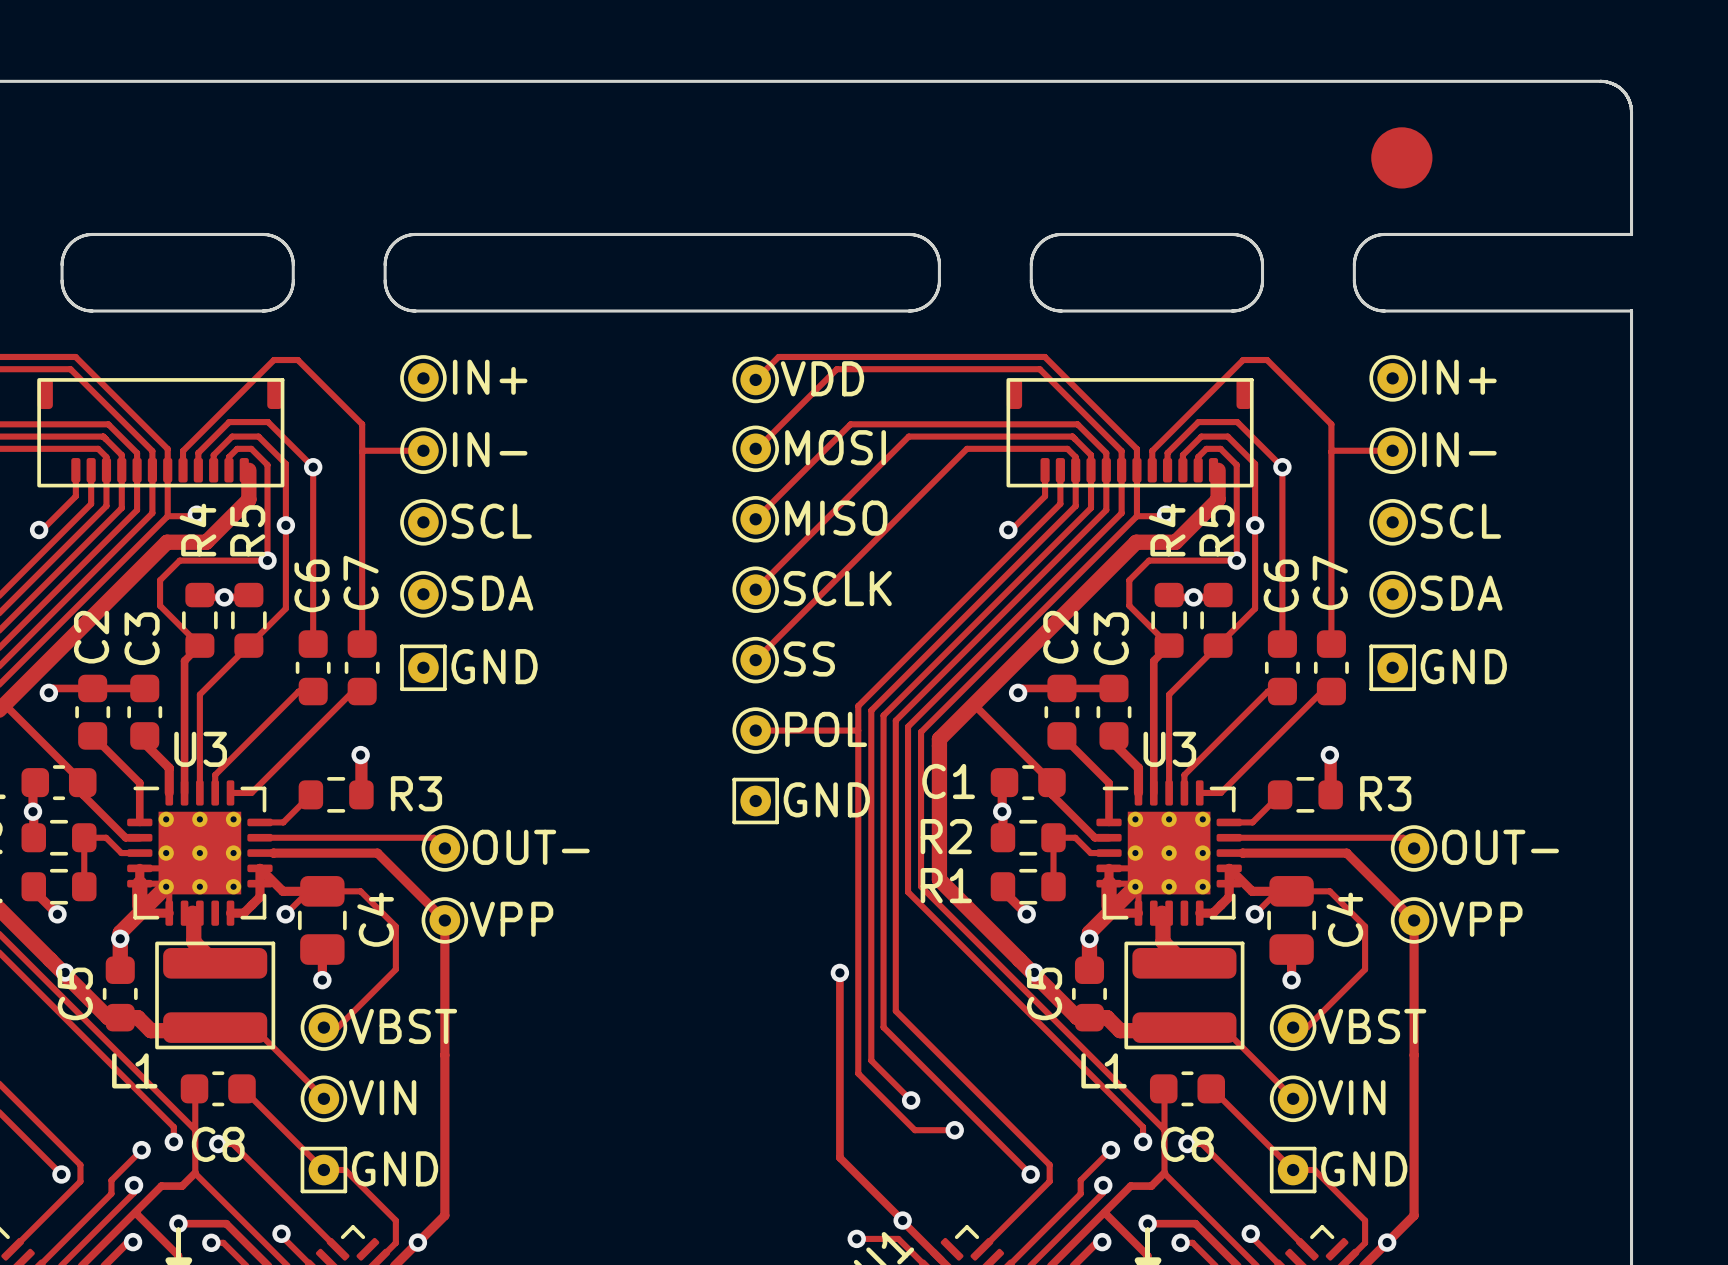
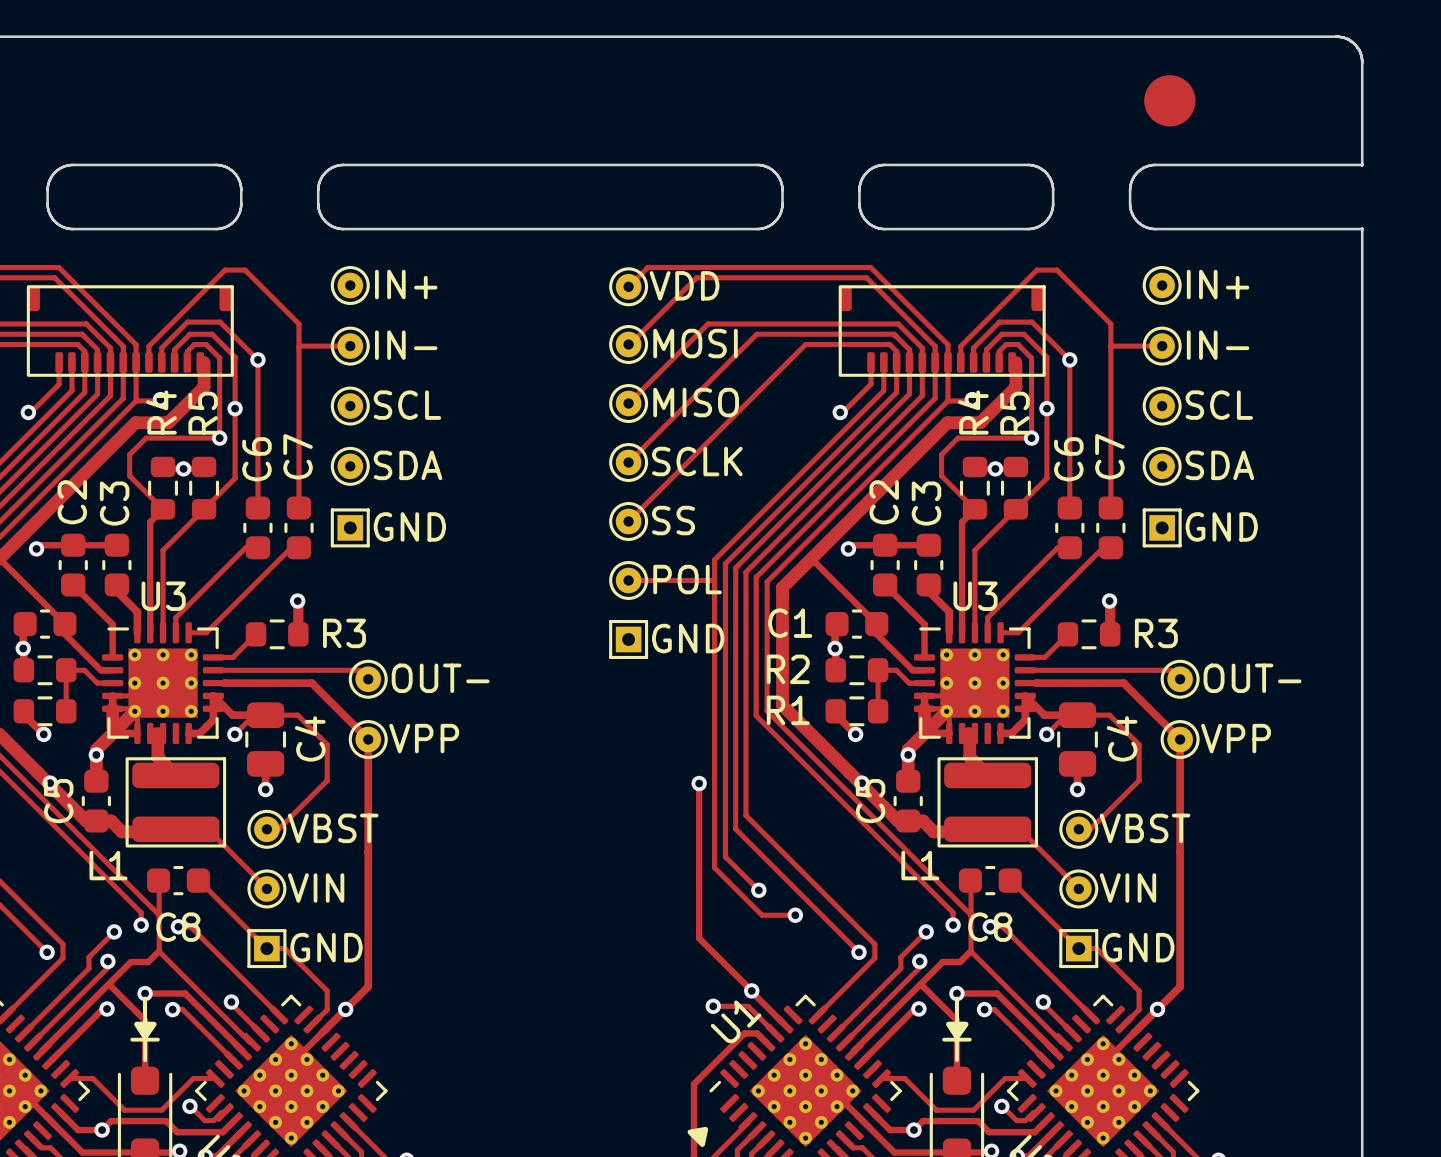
part footprint: [400, 644, 447, 692] -> [330, 508, 370, 548]
part footprint: [1369, 644, 1416, 692] -> [1142, 508, 1182, 548]
part footprint: [732, 777, 779, 825] -> [609, 620, 649, 659]
part footprint: [300, 1146, 348, 1194] -> [247, 929, 287, 969]
part footprint: [1269, 1146, 1317, 1194] -> [1059, 929, 1099, 969]

